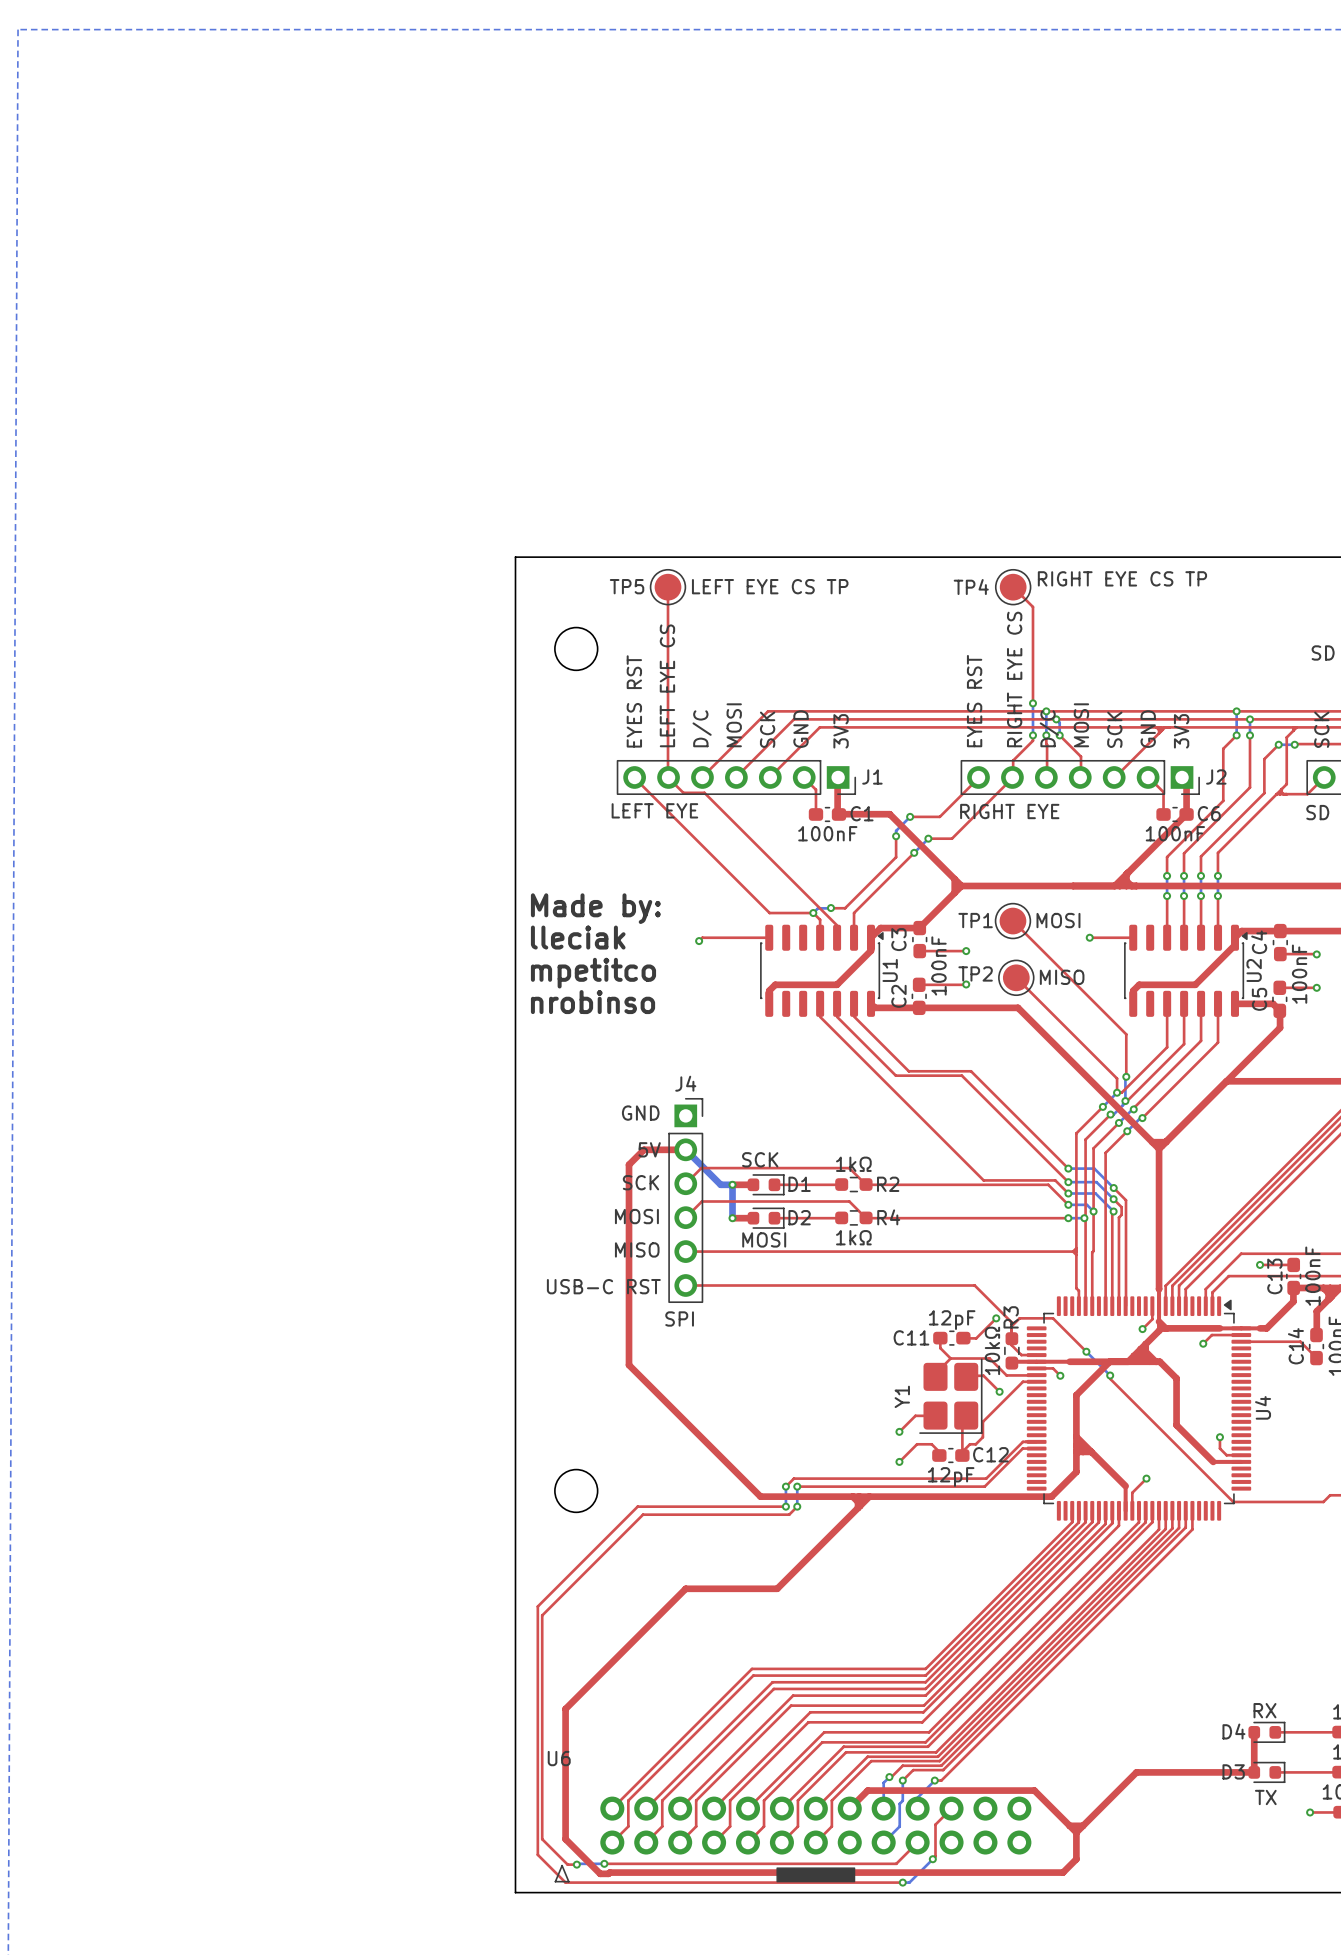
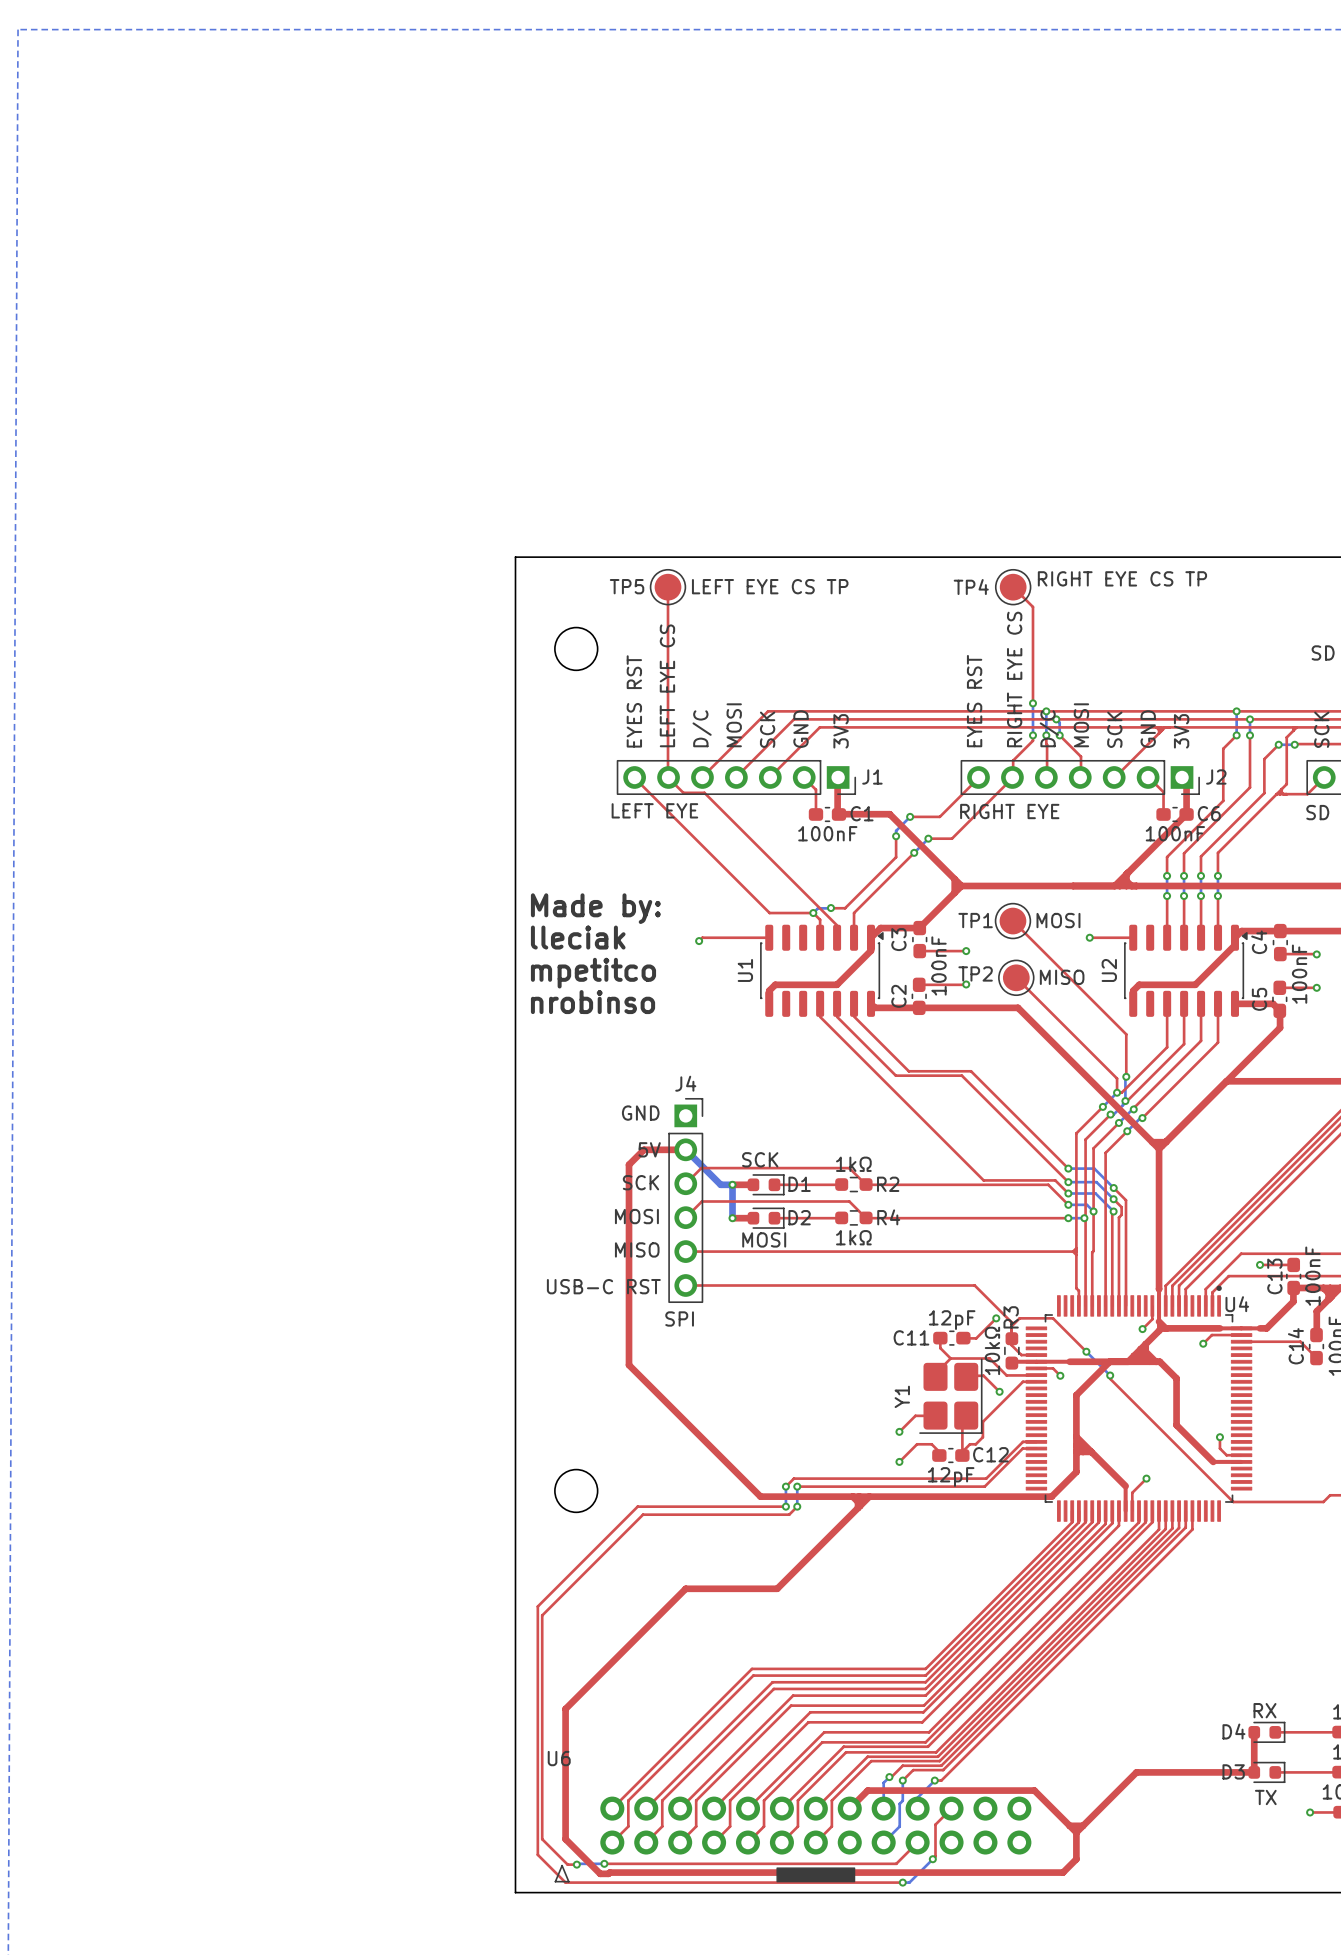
U1 name position: U1 (890, 970) -> U1 (745, 970)
U2 name position: U2 (1254, 970) -> U2 (1109, 970)
U4 footprint: [1026, 1296, 1252, 1521] -> [1025, 1285, 1253, 1522]
U4 name position: U4 (1263, 1407) -> U4 (1237, 1304)

